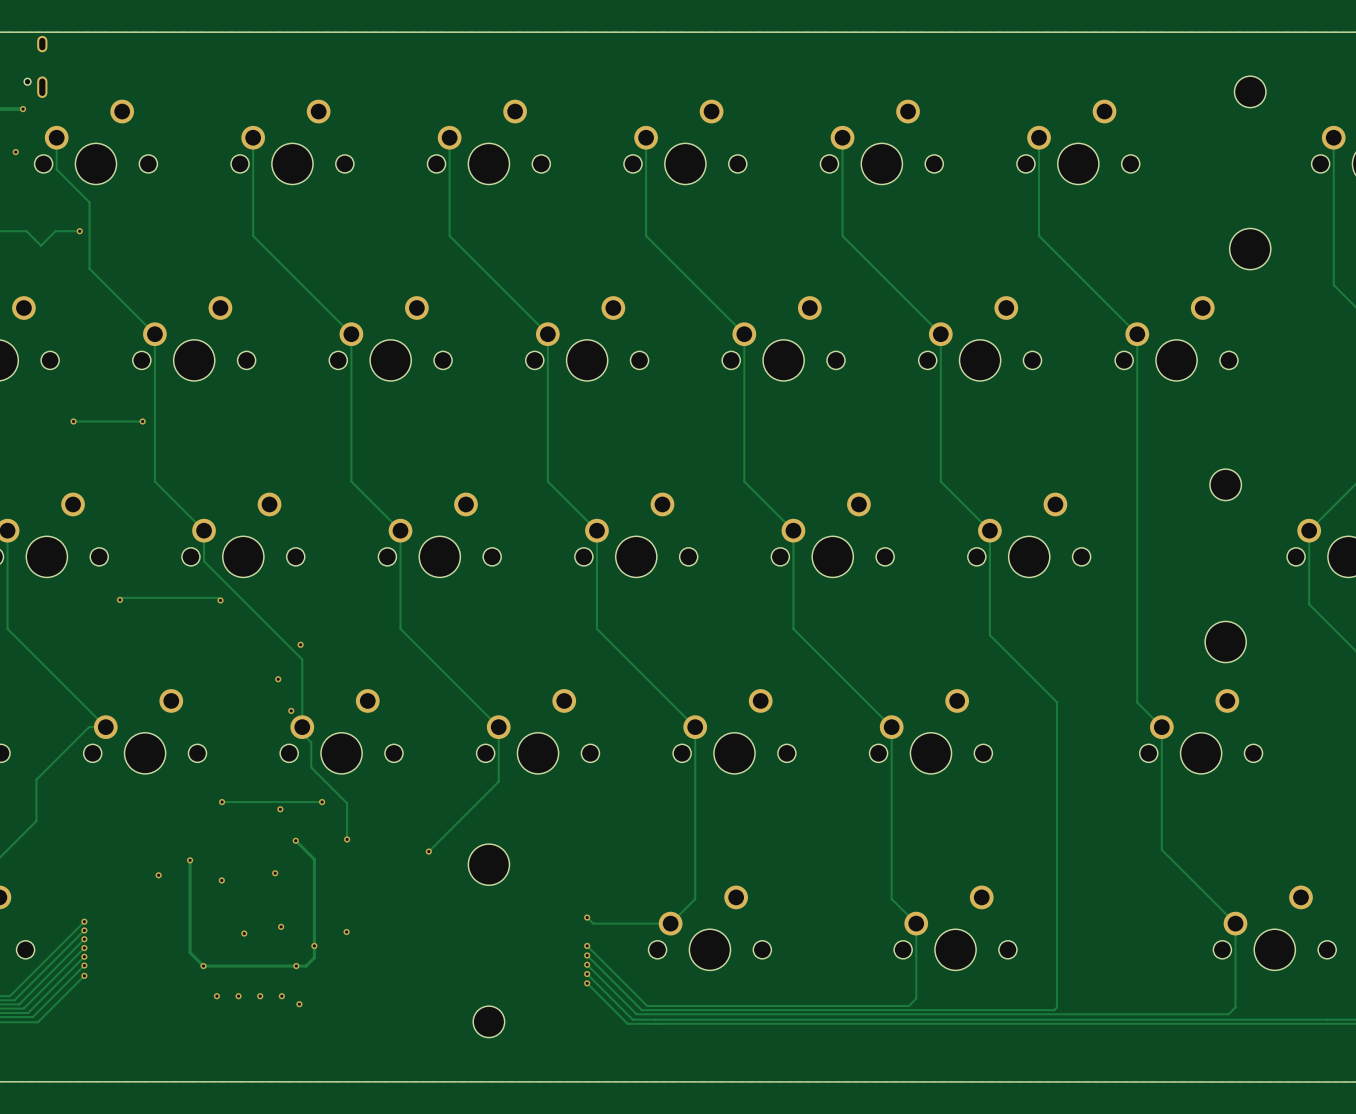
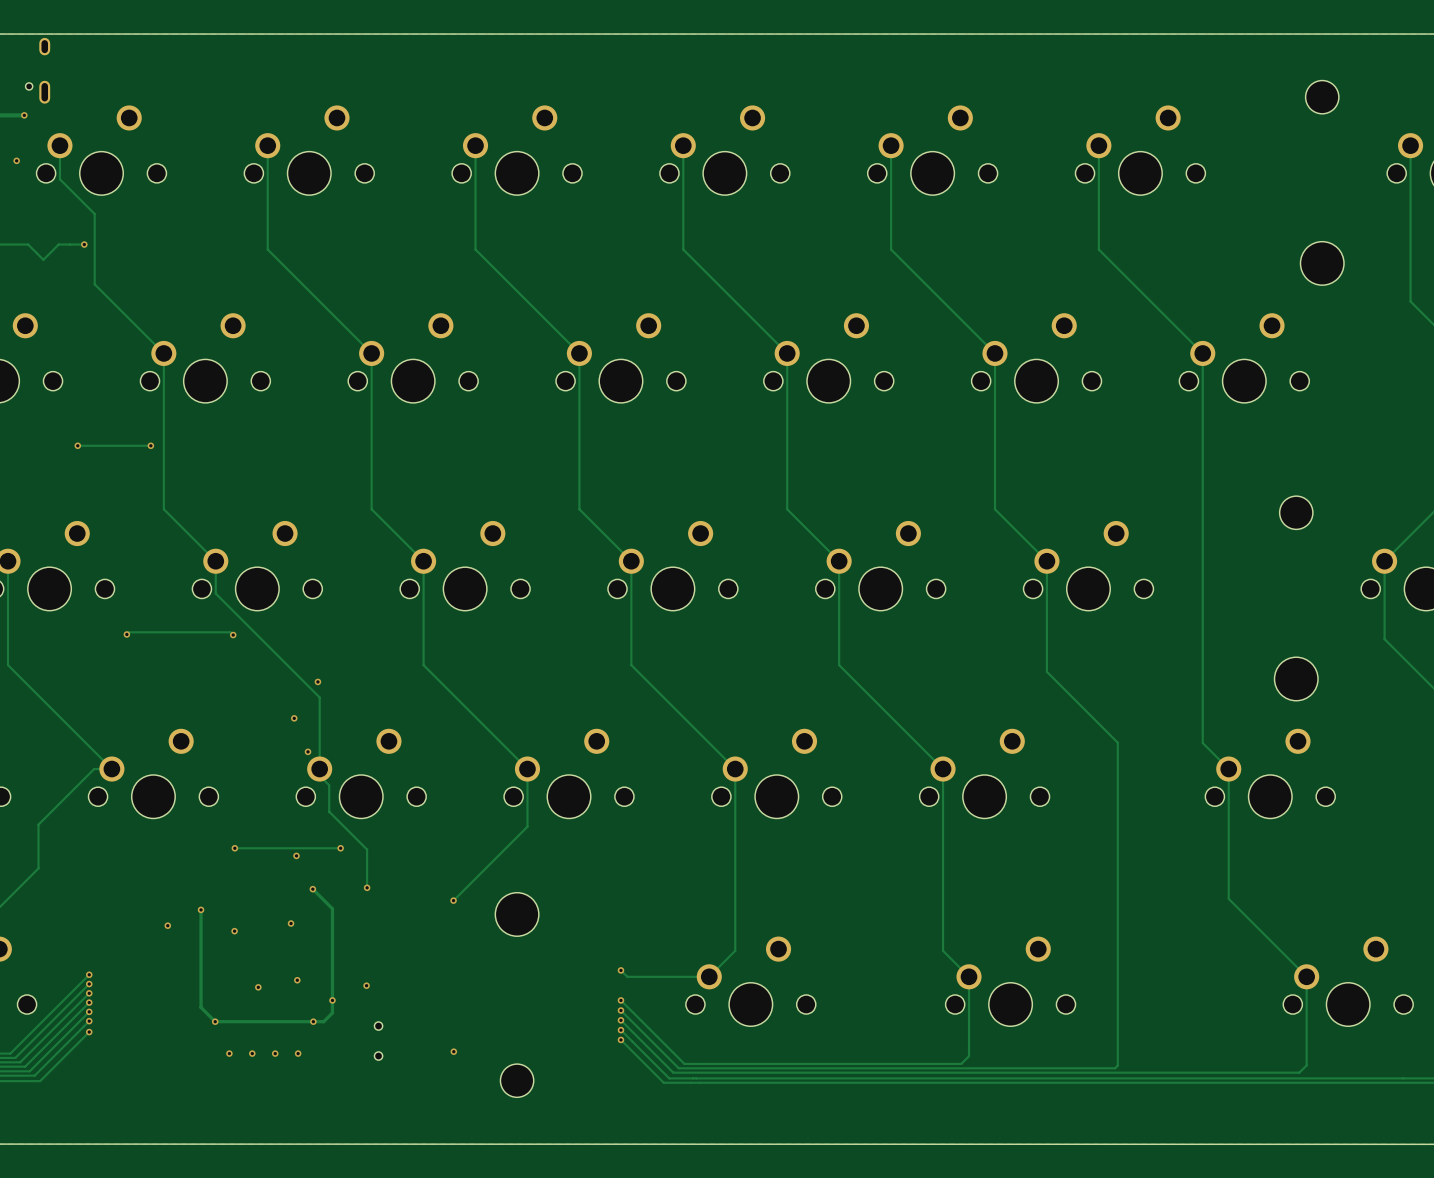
part: none -> (378, 1041)
via: none -> (453, 1051)
via: (299, 1004) -> none

